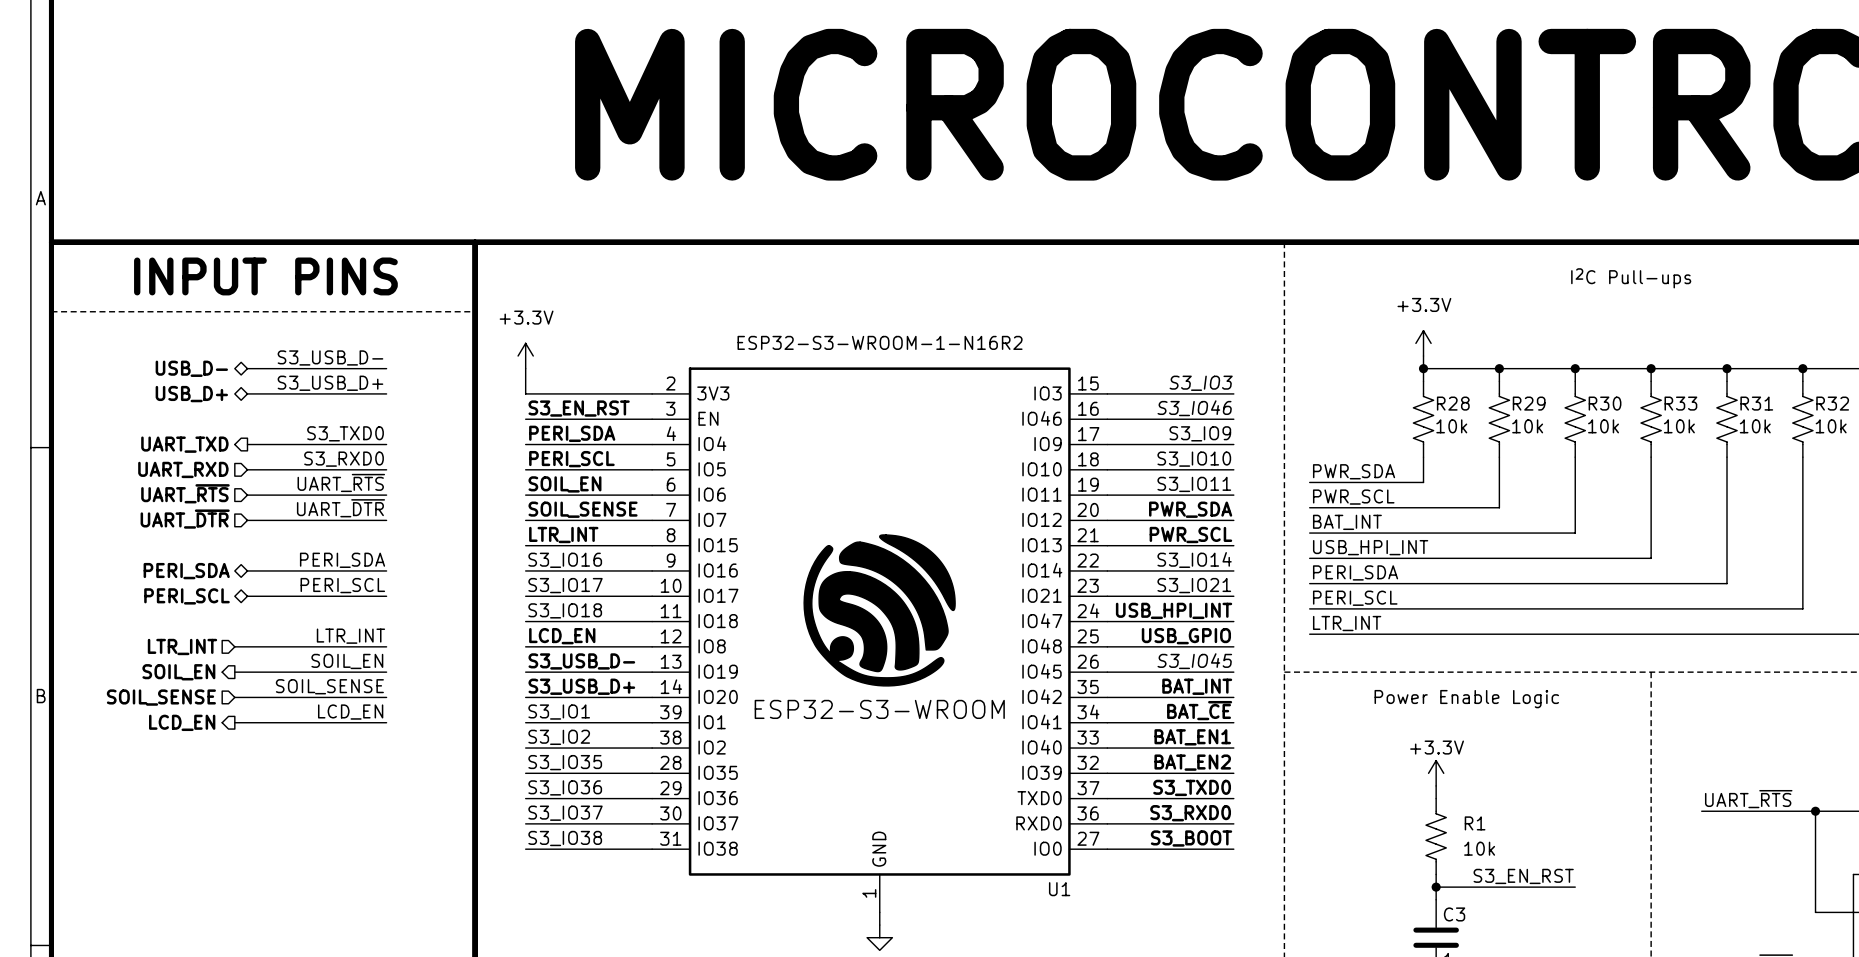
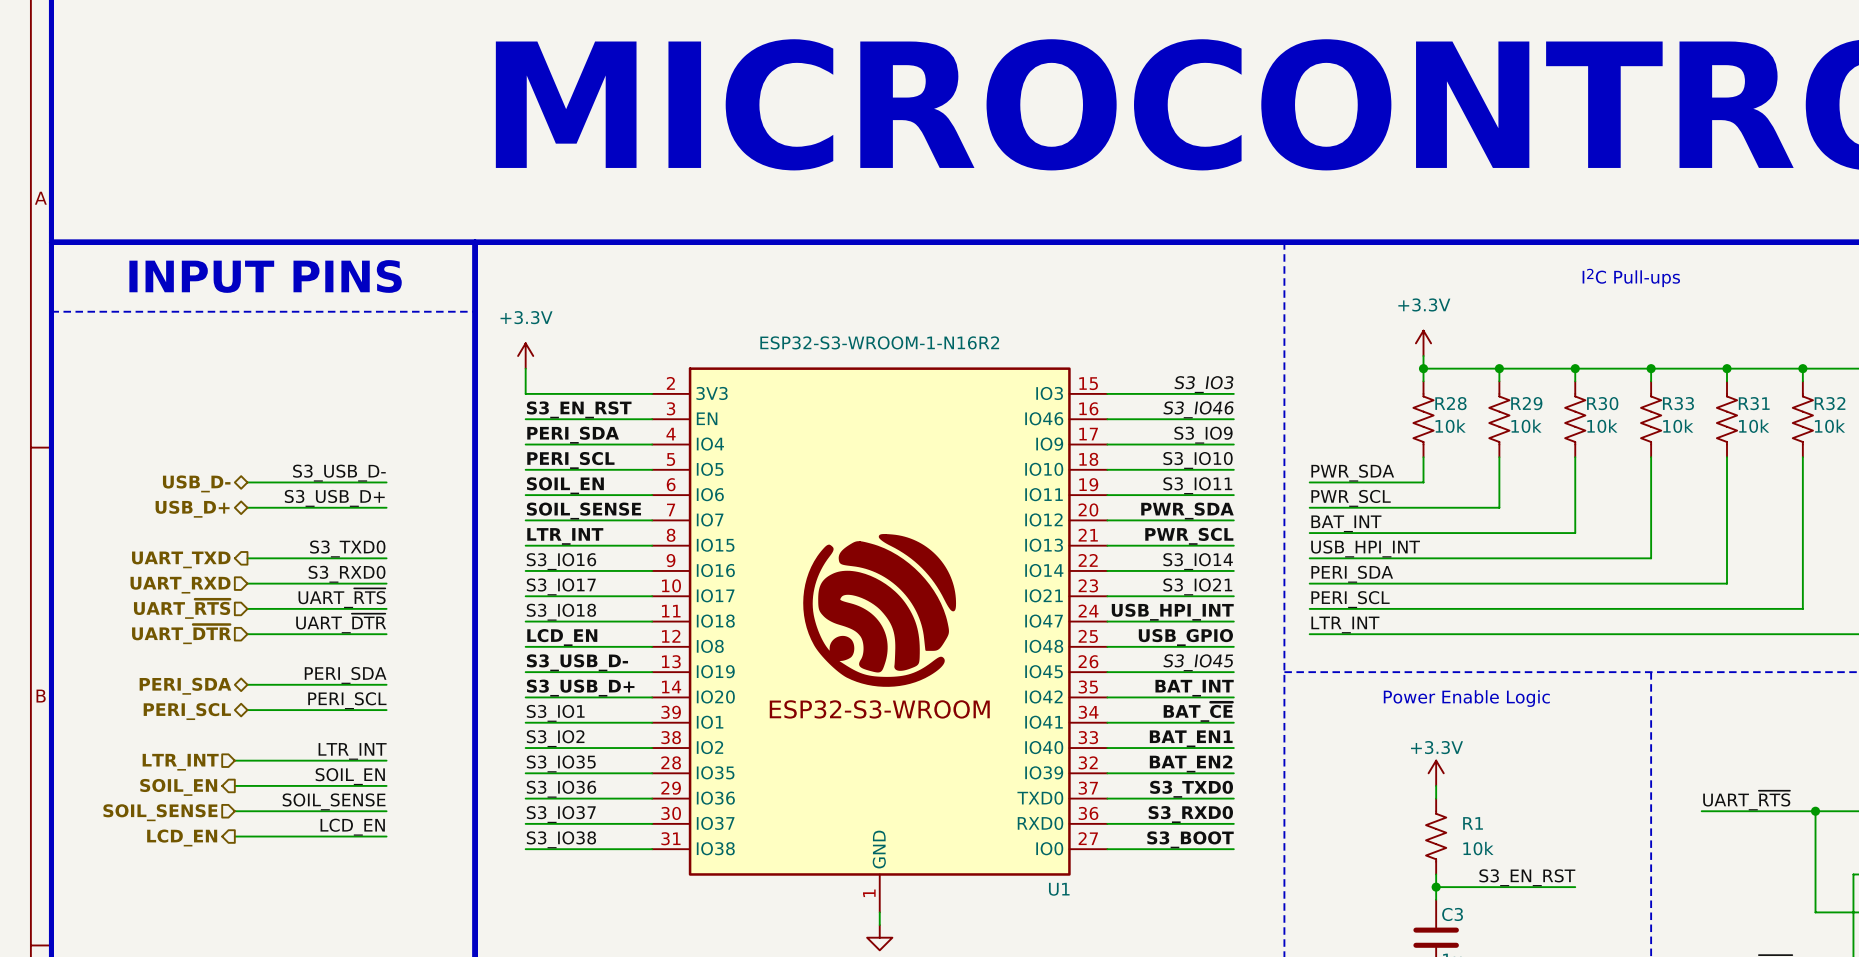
label position: S3_USB_D- (330, 357) -> S3_USB_D- (339, 473)
hierarchical label position: USB_D- (191, 368) -> USB_D- (196, 483)
wire: (247, 368) (386, 368) -> (247, 482) (386, 482)
label position: S3_USB_D+ (330, 383) -> S3_USB_D+ (334, 498)
wire: (247, 393) (386, 393) -> (247, 507) (386, 507)
hierarchical label position: USB_D+ (191, 394) -> USB_D+ (192, 509)
label position: S3_TXD0 (345, 433) -> S3_TXD0 (347, 548)
hierarchical label position: UART_TXD (184, 444) -> UART_TXD (181, 559)
wire: (247, 444) (386, 444) -> (247, 558) (386, 558)
label position: S3_RXD0 (344, 459) -> S3_RXD0 (347, 574)
hierarchical label position: UART_RXD (183, 469) -> UART_RXD (180, 585)
wire: (247, 469) (386, 469) -> (247, 583) (386, 583)
label position: UART_~{RTS} (341, 482) -> UART_~{RTS} (342, 598)
hierarchical label position: UART_~{RTS} (185, 493) -> UART_~{RTS} (182, 609)
wire: (247, 495) (386, 495) -> (247, 608) (386, 608)
label position: UART_~{DTR} (340, 508) -> UART_~{DTR} (341, 623)
hierarchical label position: UART_~{DTR} (185, 519) -> UART_~{DTR} (181, 634)
wire: (247, 520) (386, 520) -> (247, 634) (386, 634)
label position: PERI_SDA (342, 560) -> PERI_SDA (345, 675)
wire: (247, 570) (386, 570) -> (247, 684) (386, 684)
hierarchical label position: PERI_SDA (186, 571) -> PERI_SDA (185, 686)
label position: PERI_SCL (342, 585) -> PERI_SCL (347, 700)
hierarchical label position: PERI_SCL (186, 596) -> PERI_SCL (187, 711)
wire: (247, 596) (386, 596) -> (247, 710) (386, 710)
label position: LTR_INT (350, 636) -> LTR_INT (352, 751)
hierarchical label position: LTR_INT (182, 646) -> LTR_INT (180, 762)
wire: (234, 646) (386, 646) -> (234, 760) (386, 760)
label position: SOIL_EN (347, 661) -> SOIL_EN (350, 776)
hierarchical label position: SOIL_EN (178, 672) -> SOIL_EN (178, 787)
wire: (234, 672) (386, 672) -> (234, 785) (386, 785)
label position: SOIL_SENSE (329, 686) -> SOIL_SENSE (334, 801)
hierarchical label position: SOIL_SENSE (161, 697) -> SOIL_SENSE (160, 812)
wire: (234, 697) (386, 697) -> (234, 811) (386, 811)
label position: LCD_EN (350, 712) -> LCD_EN (352, 827)
hierarchical label position: LCD_EN (182, 722) -> LCD_EN (182, 837)
wire: (234, 722) (386, 722) -> (234, 836) (386, 836)

